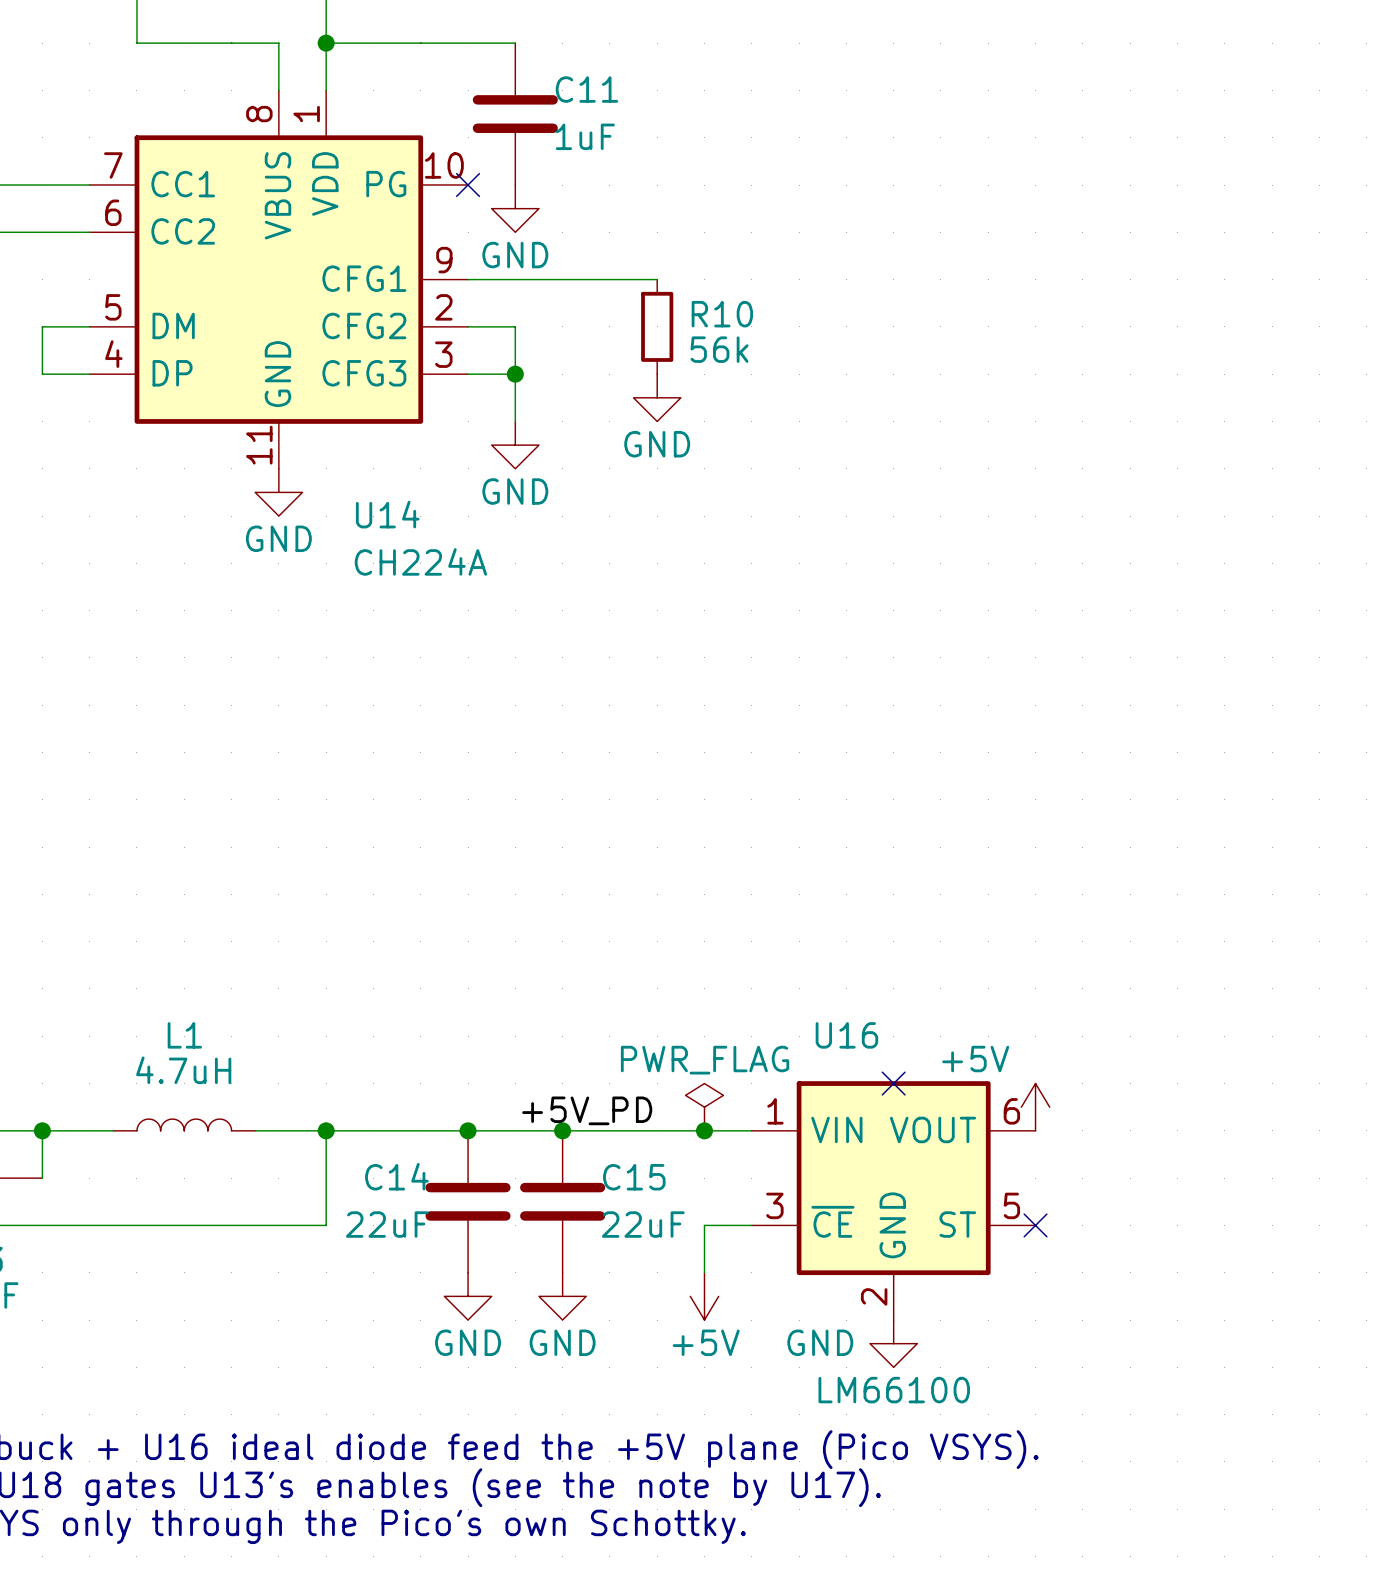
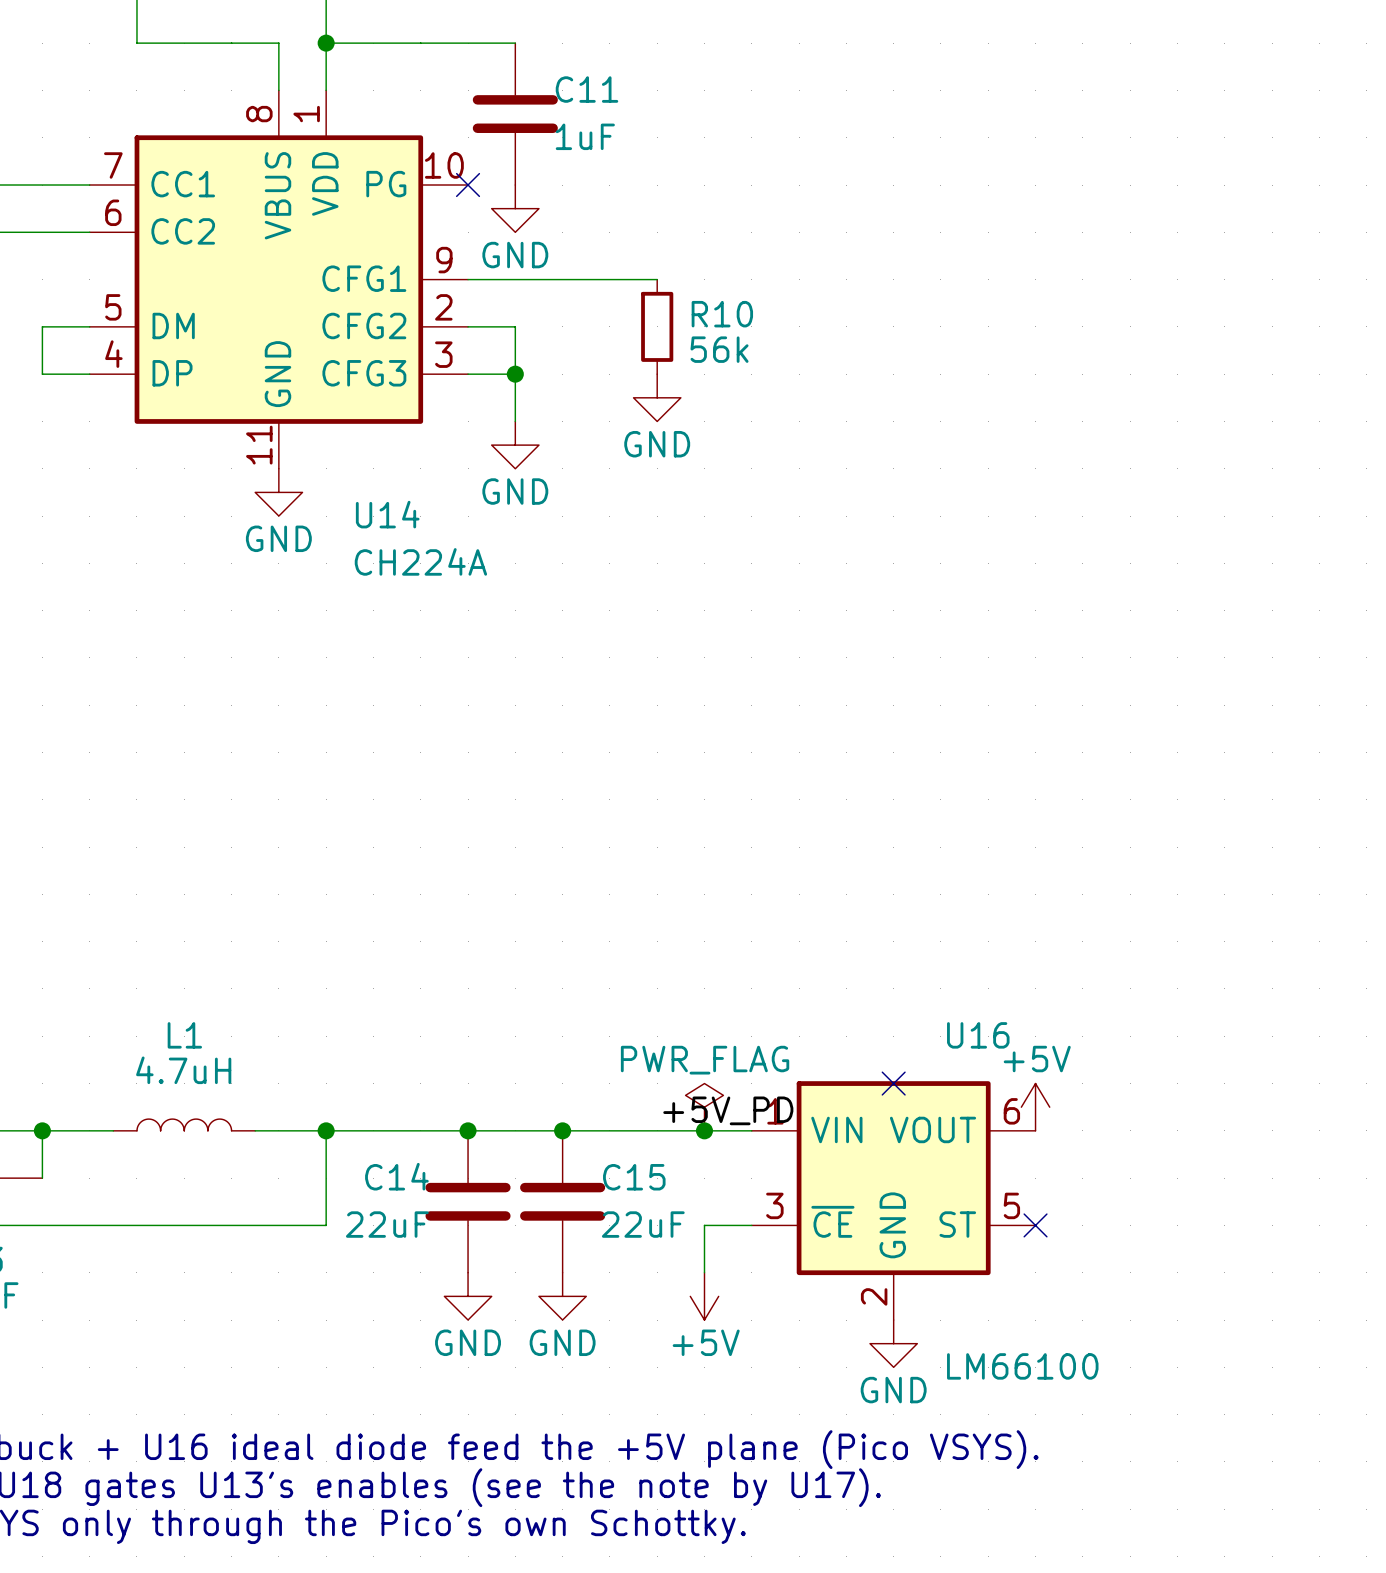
U16 name position: U16 (846, 1035) -> U16 (978, 1035)
power symbol text position: +5V (975, 1059) -> +5V (1037, 1059)
label position: +5V_PD (587, 1110) -> +5V_PD (728, 1110)
power symbol text position: GND (820, 1342) -> GND (893, 1390)
U16 value position: LM66100 (894, 1390) -> LM66100 (1022, 1366)

